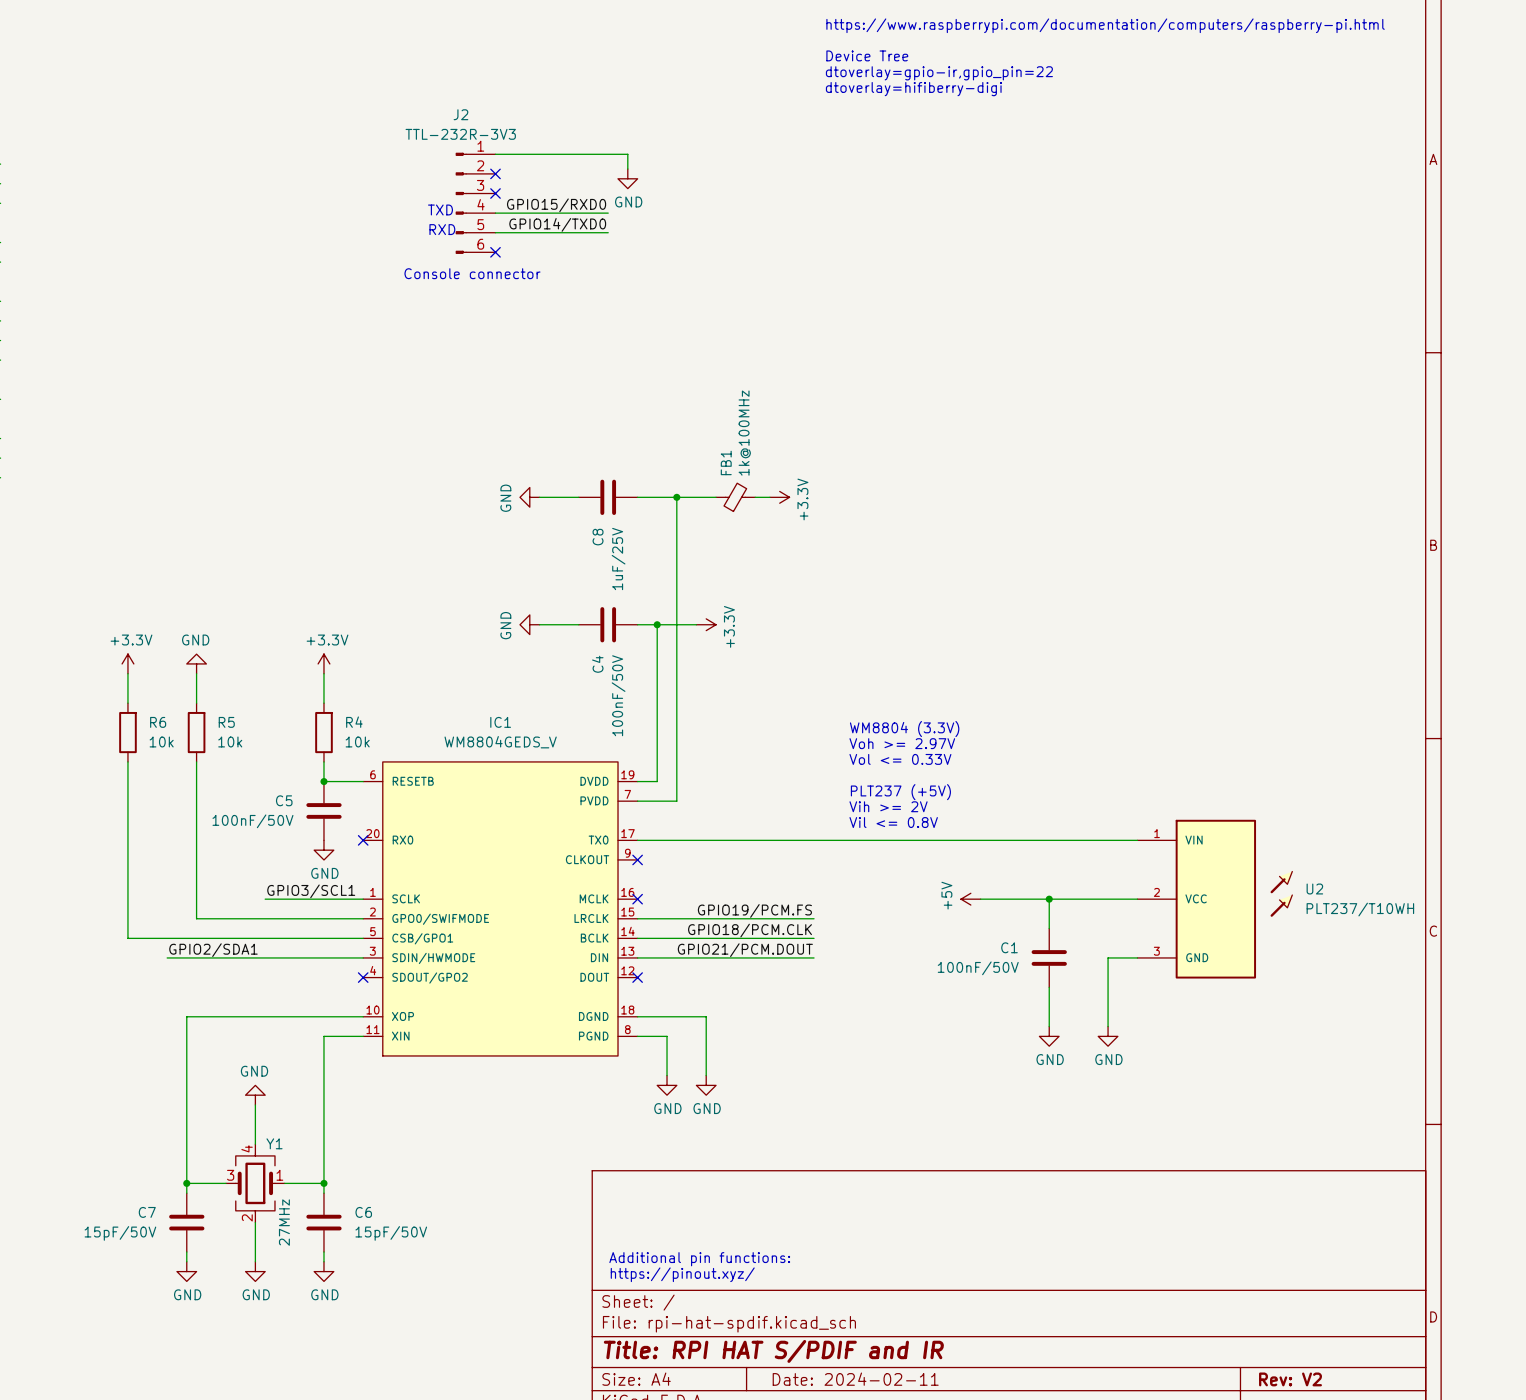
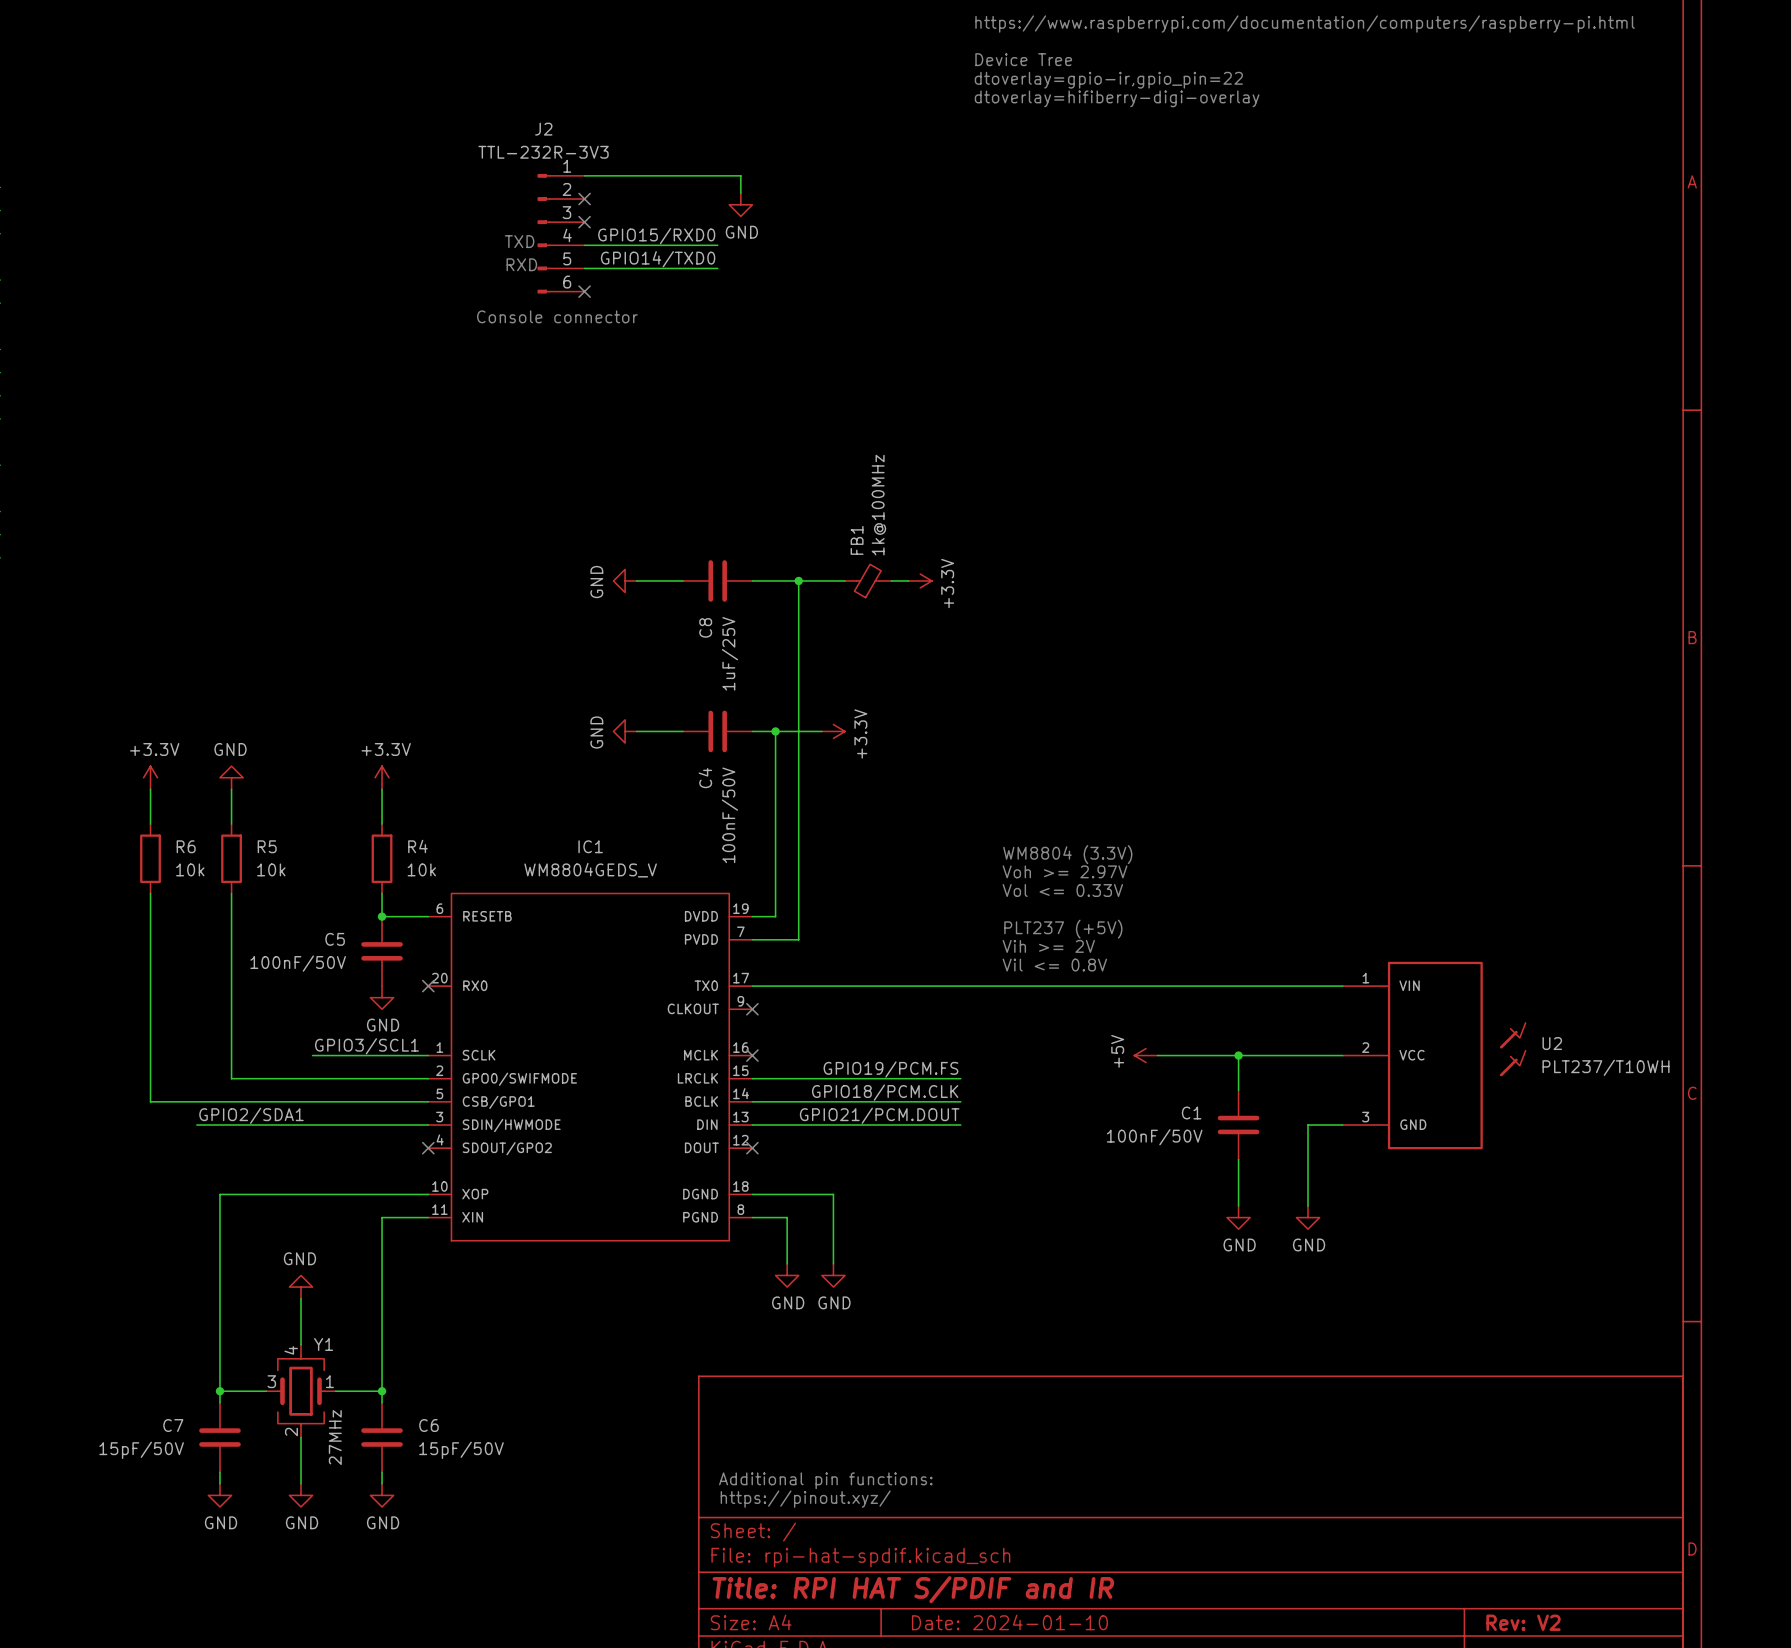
text: dtoverlay=hifiberry-digi (913, 89) -> dtoverlay=hifiberry-digi-overlay (1117, 98)
title block: Date: 2024-02-11 (855, 1379) -> Date: 2024-01-10 (1009, 1622)

